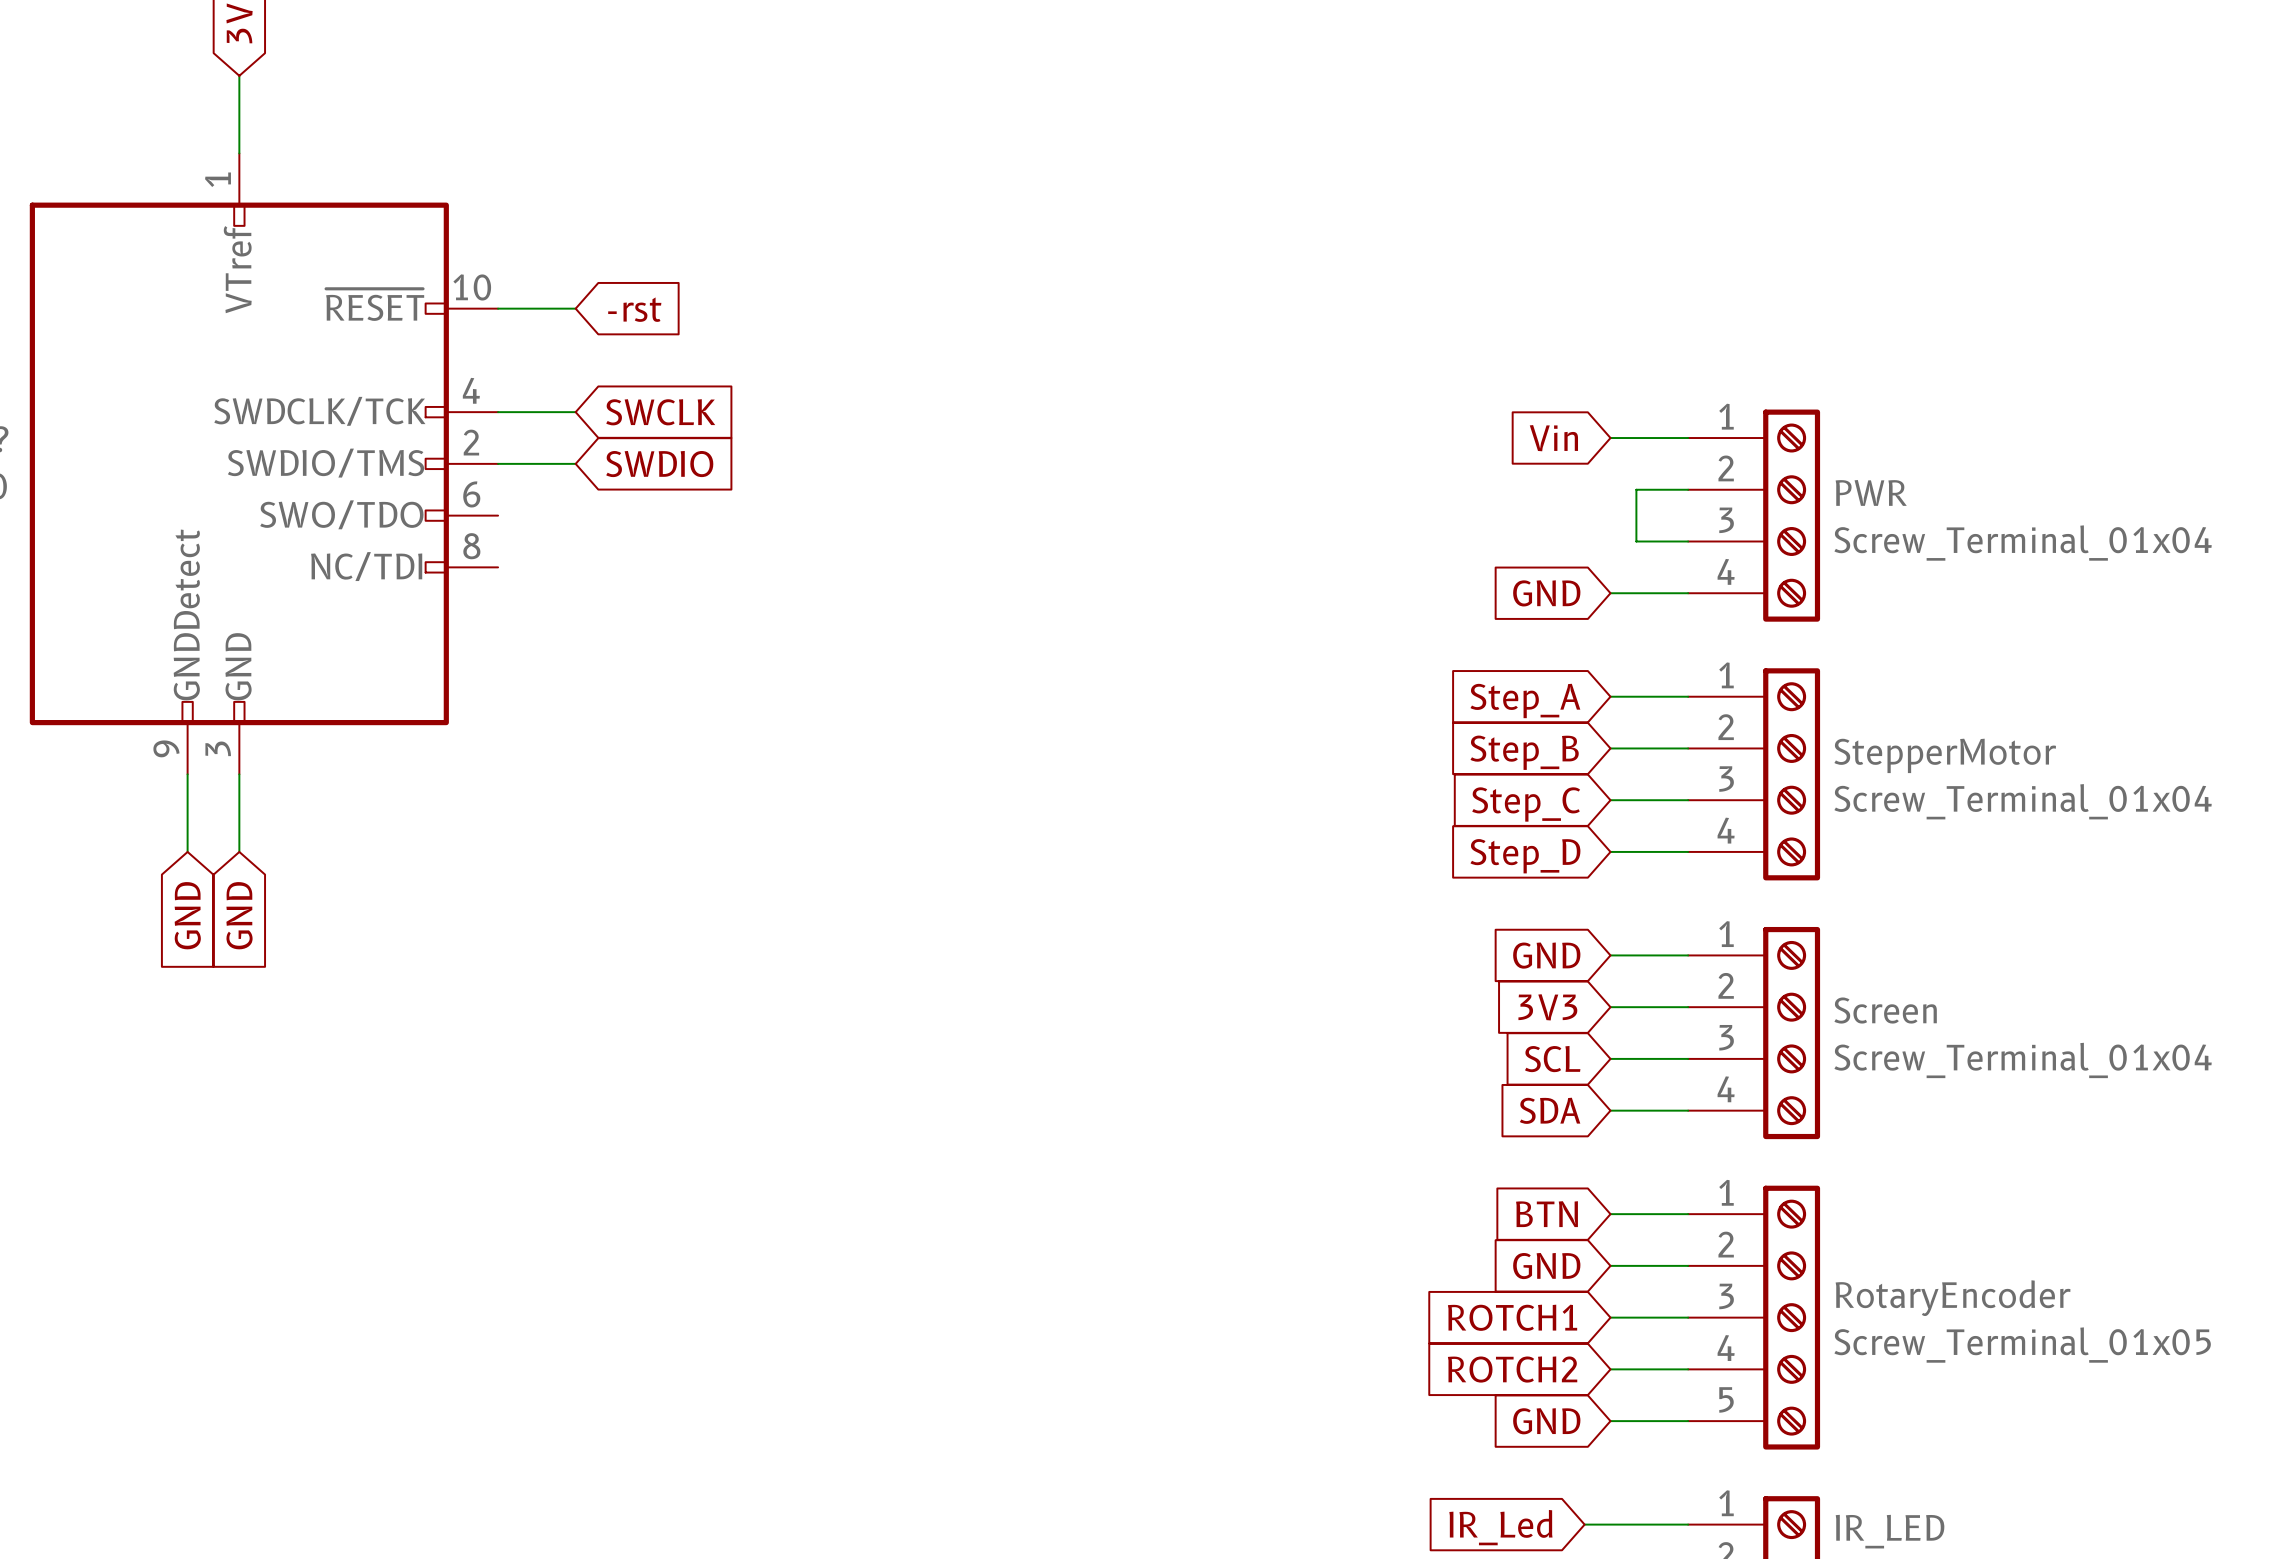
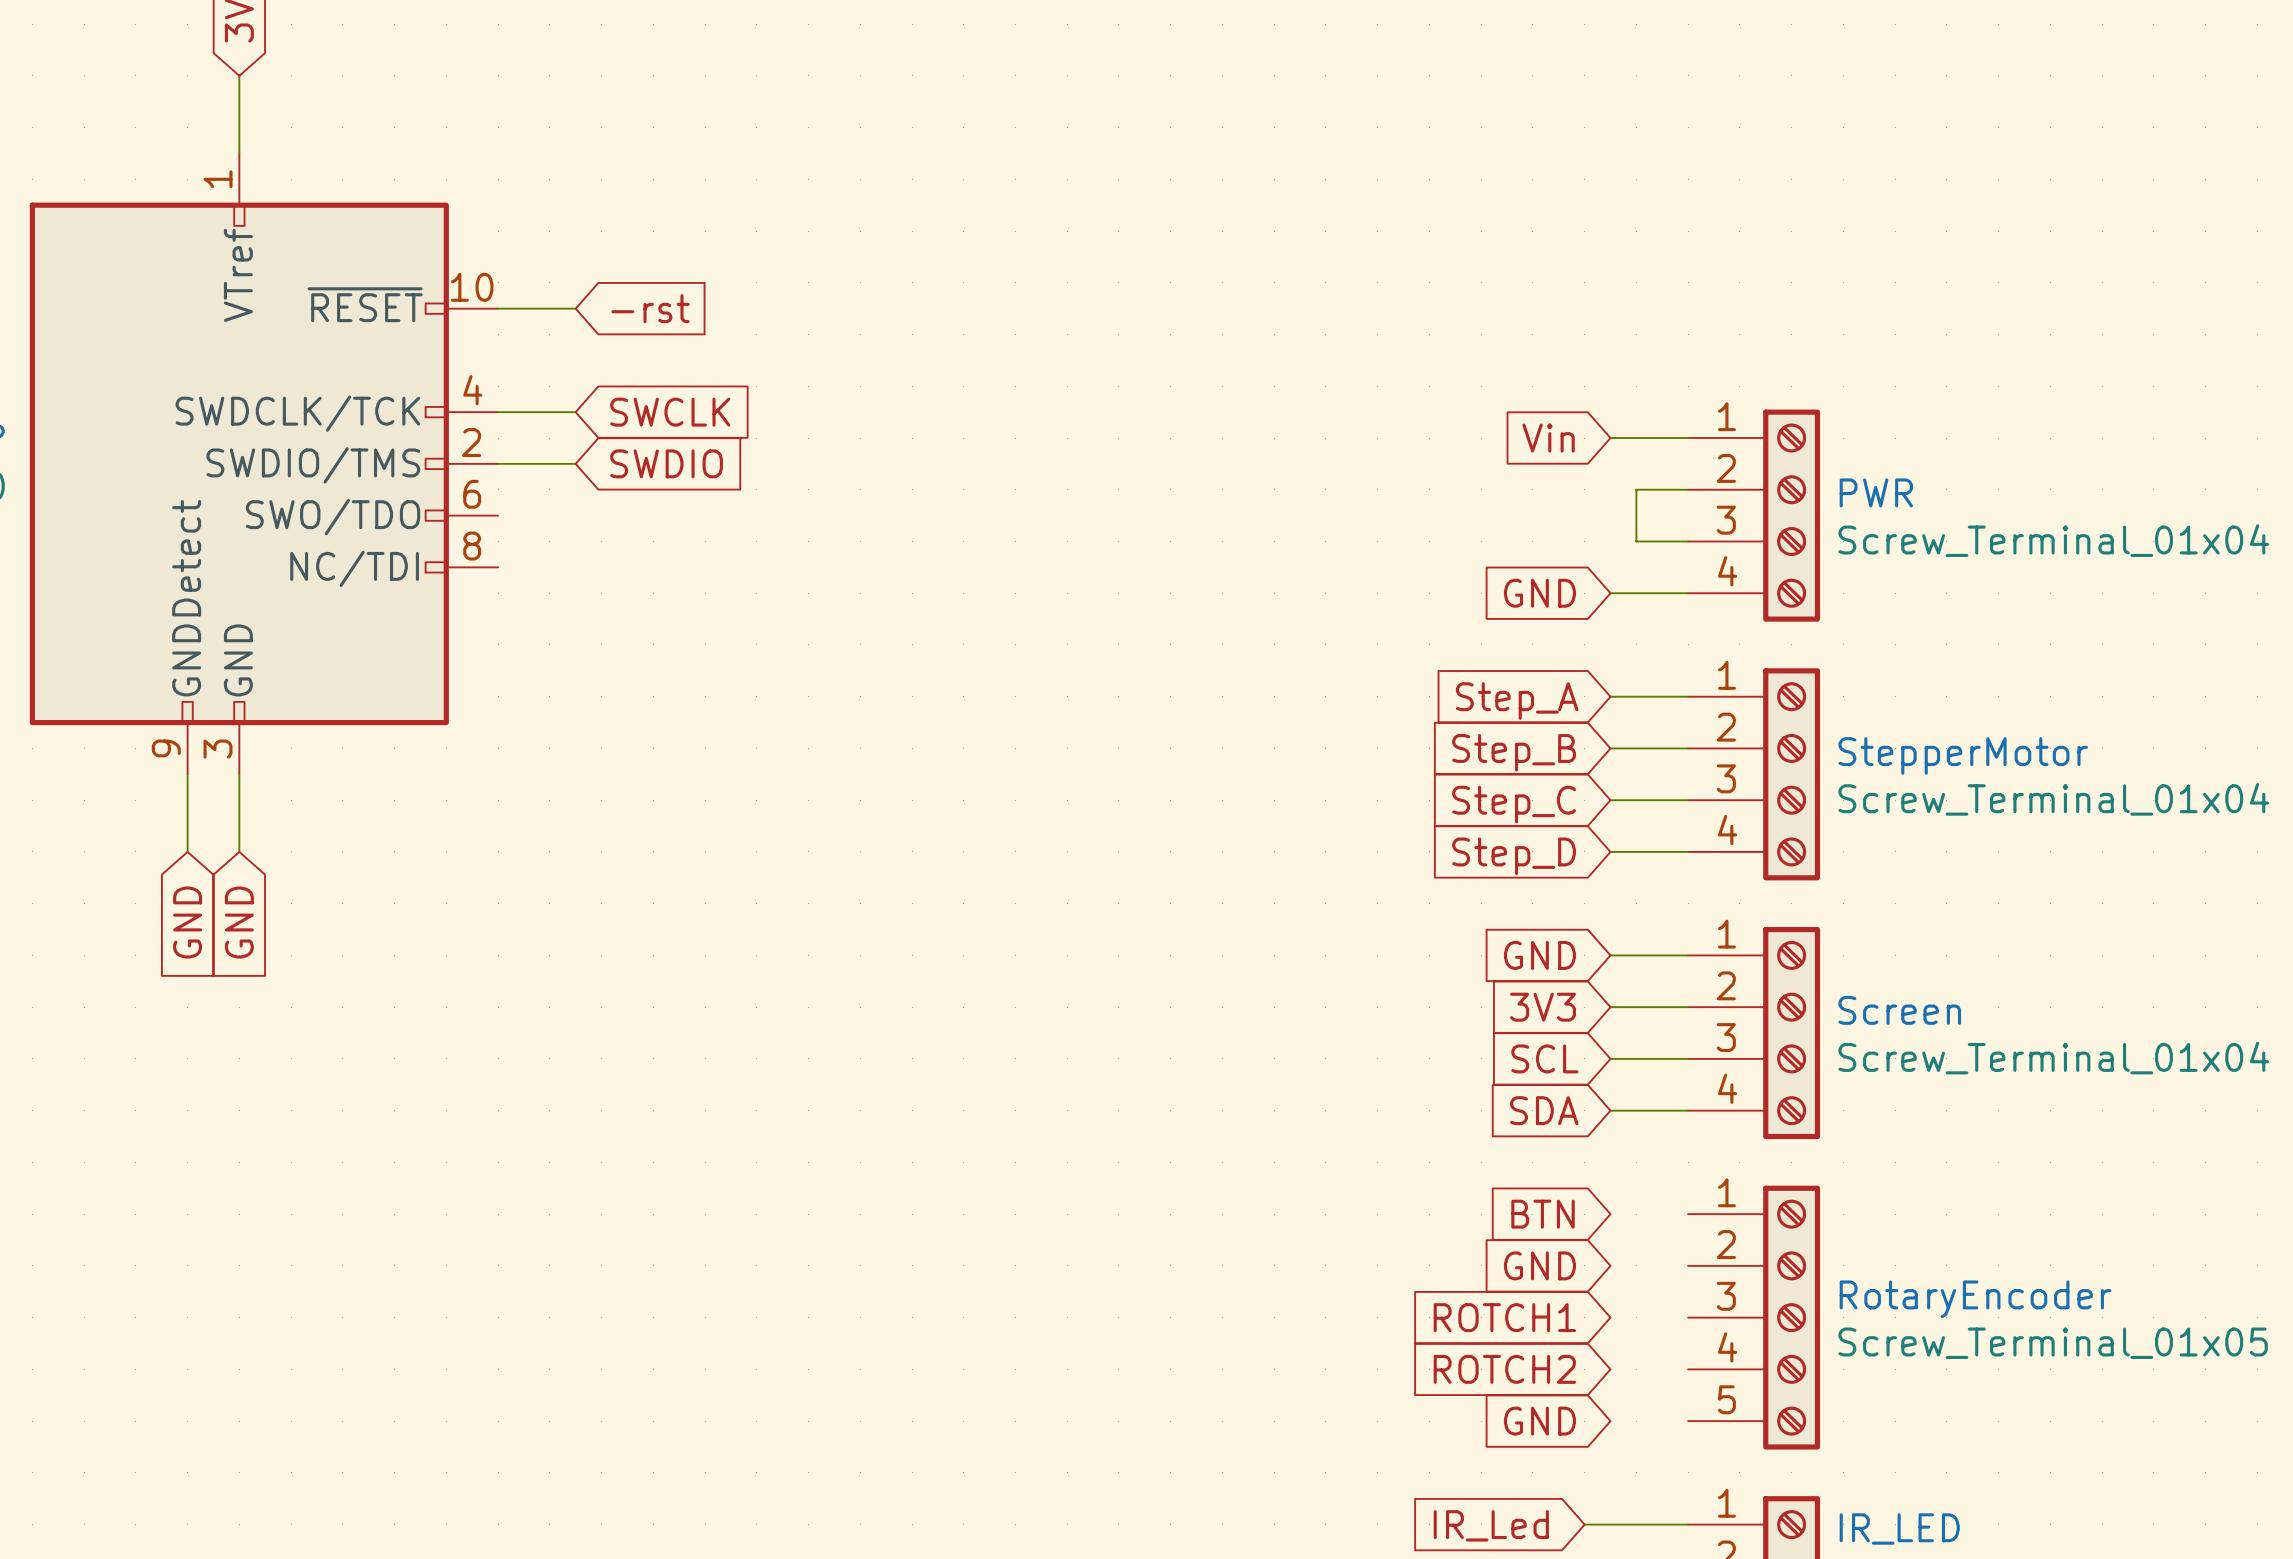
wire: (1610, 1214) (1688, 1214) -> none
wire: (1610, 1265) (1688, 1265) -> none
wire: (1610, 1317) (1688, 1317) -> none
wire: (1610, 1369) (1688, 1369) -> none
wire: (1610, 1421) (1688, 1421) -> none

